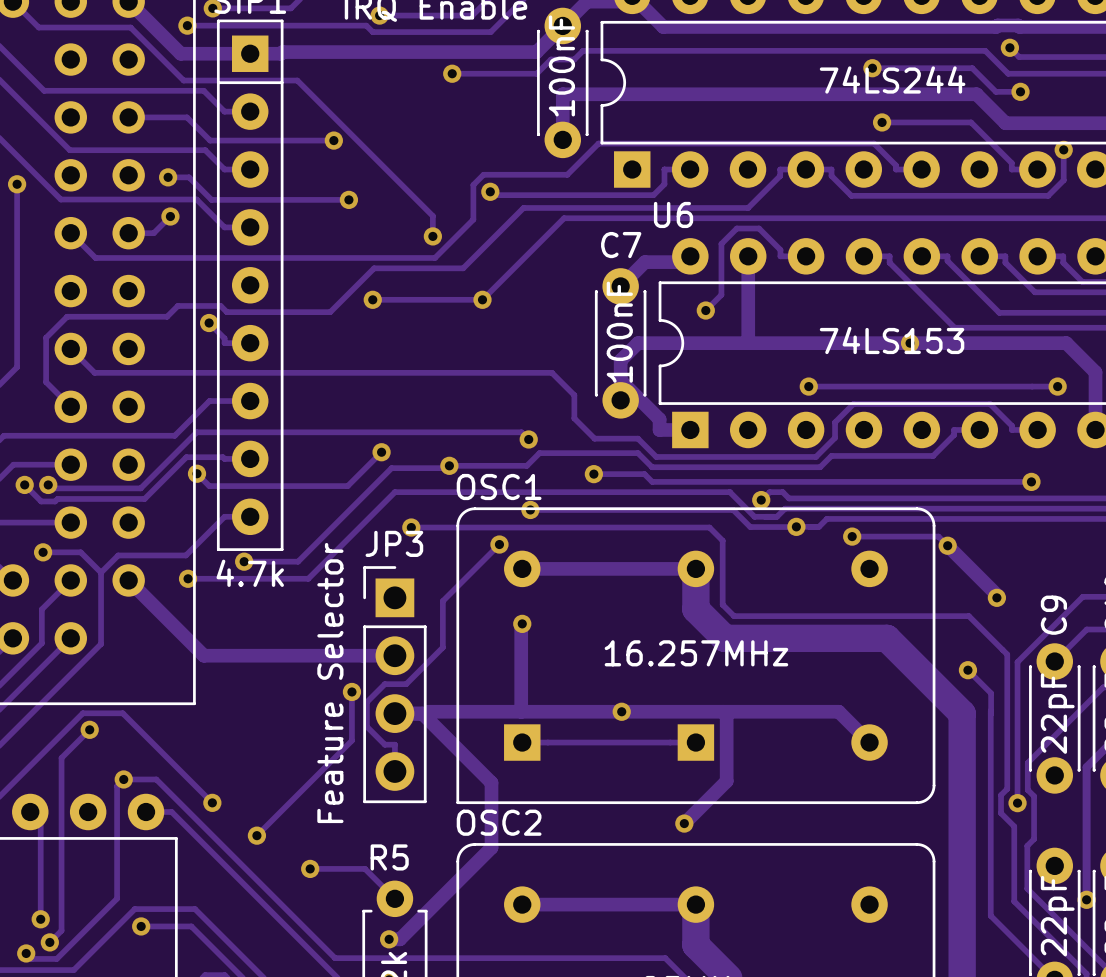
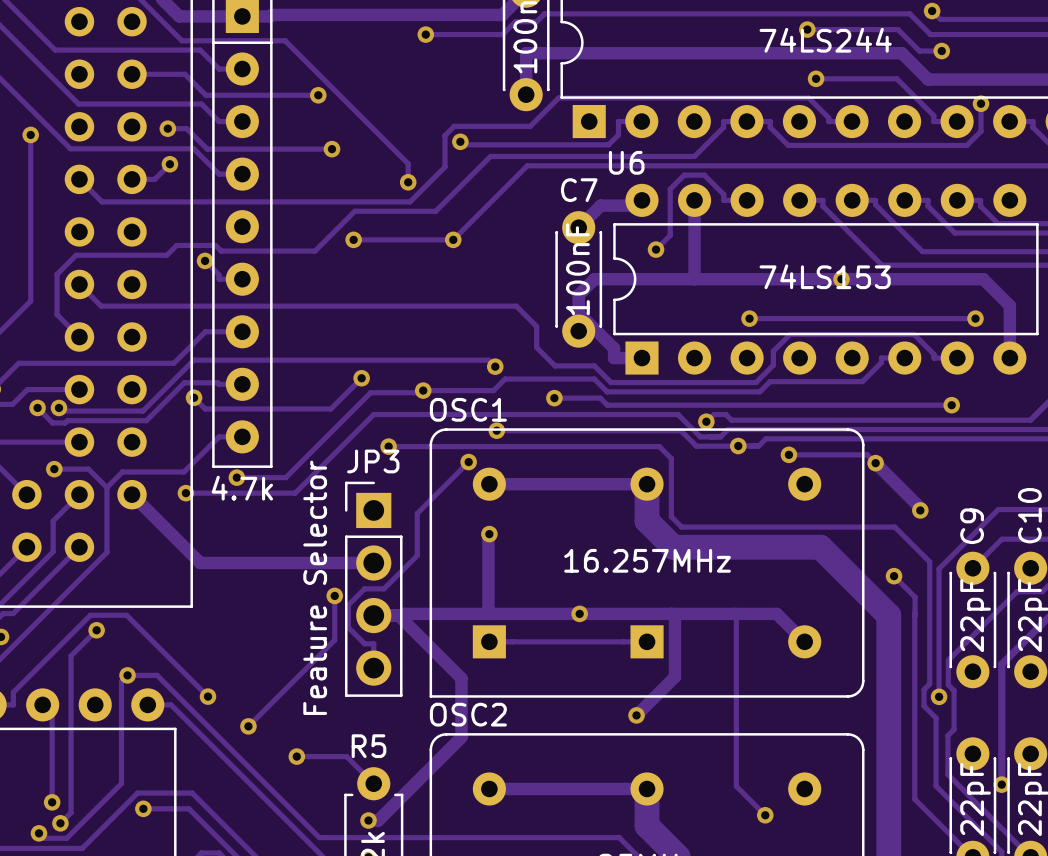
track: none -> (734, 613) (736, 615) (736, 786) (765, 815)
via: none -> (765, 815)

